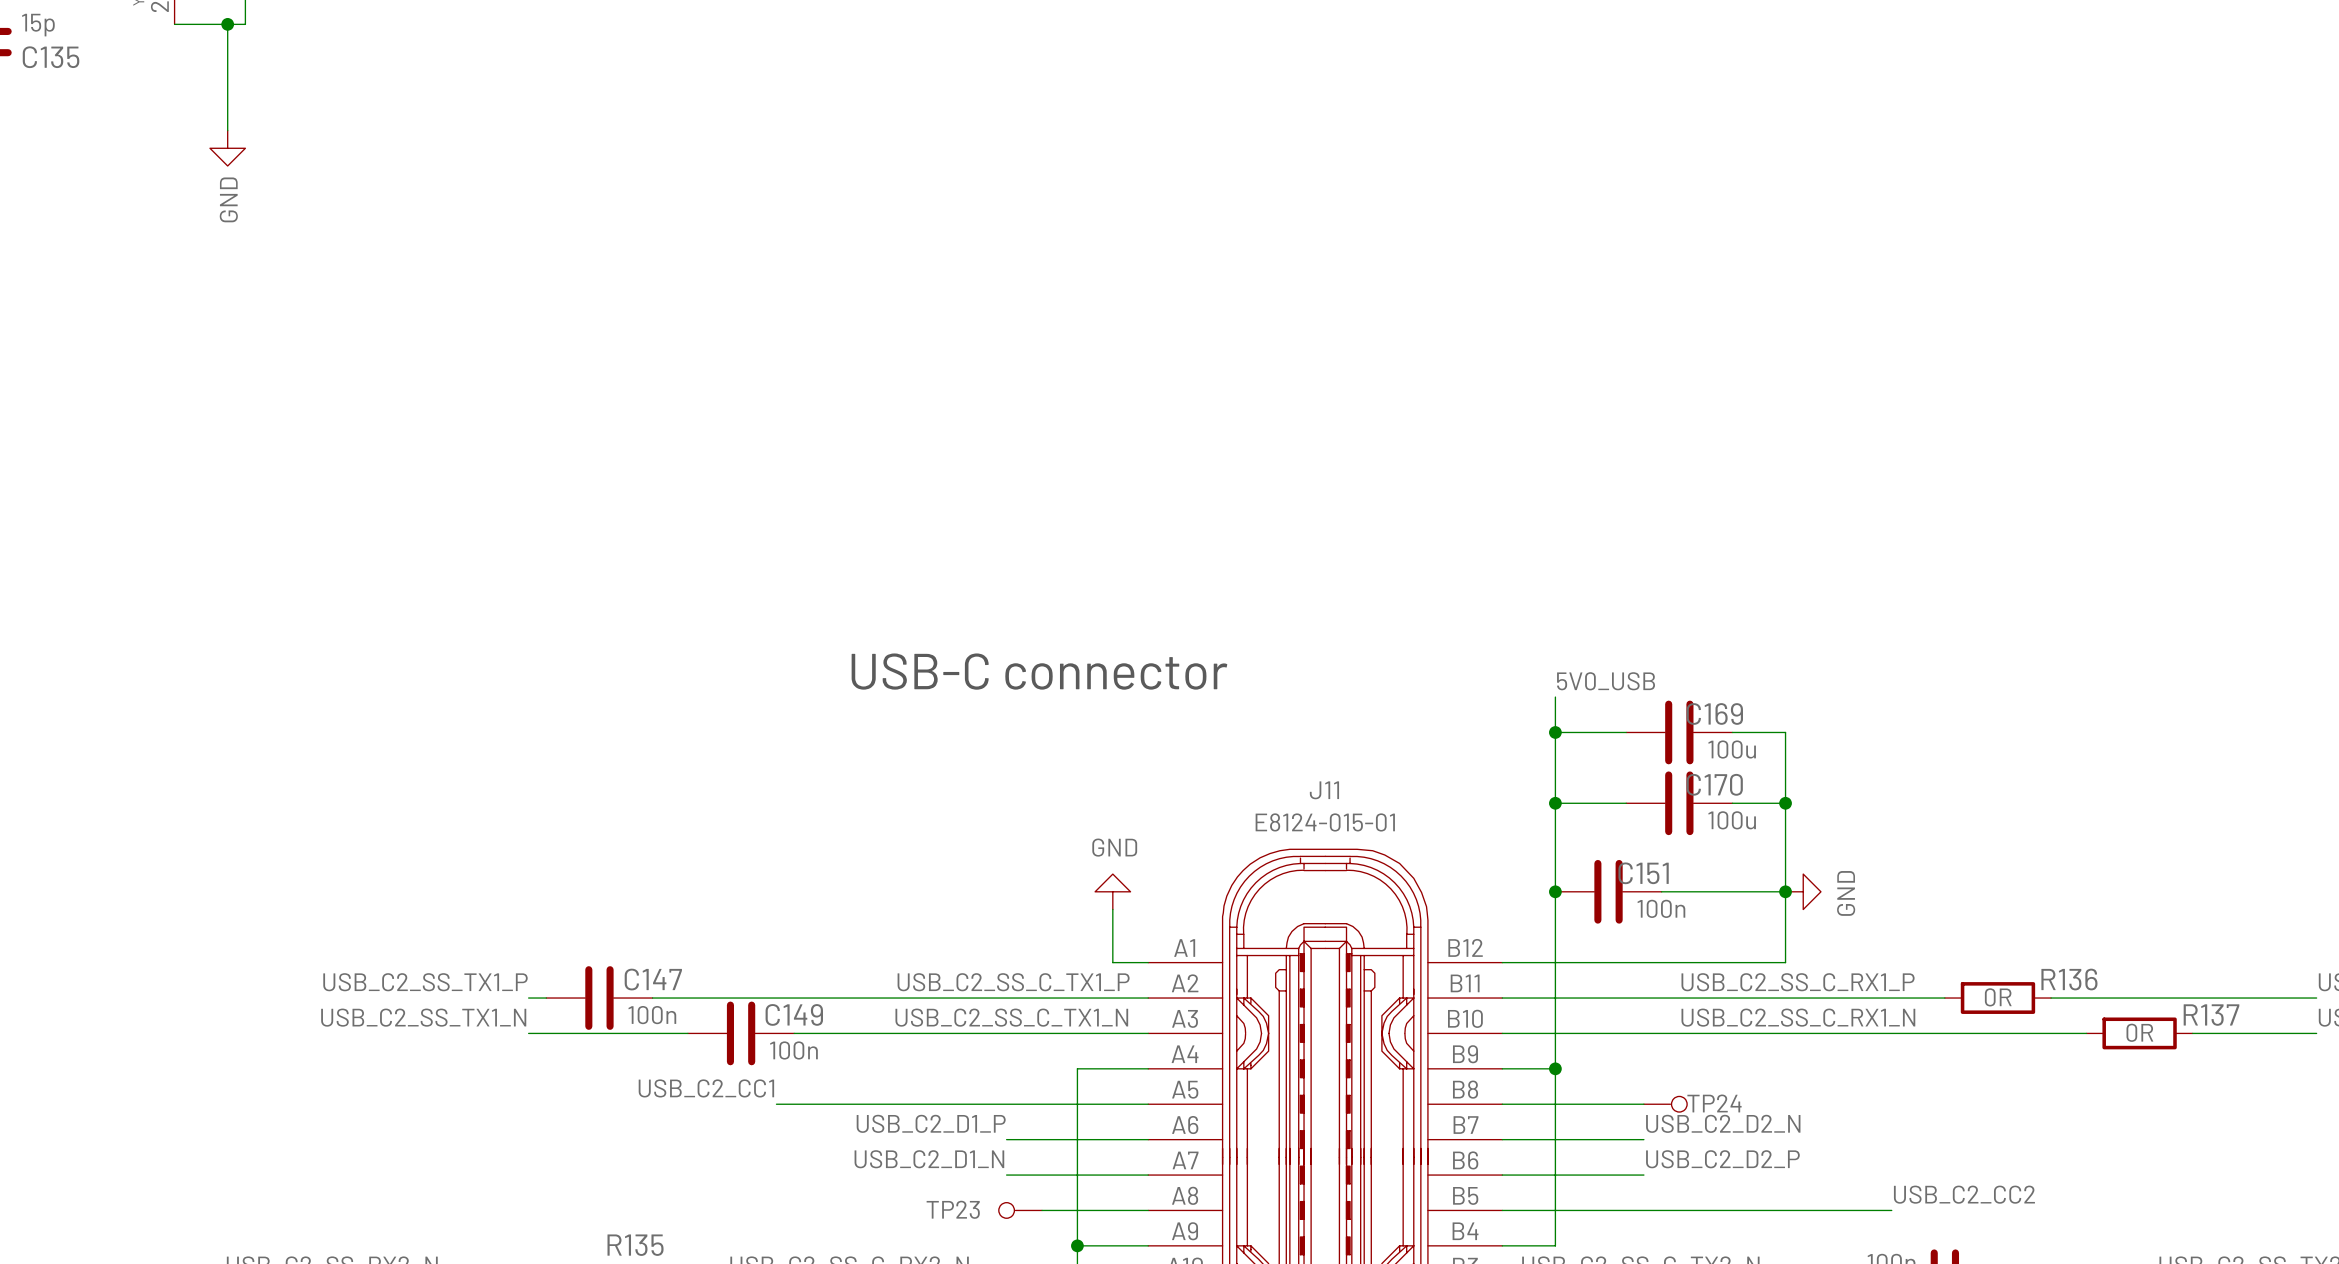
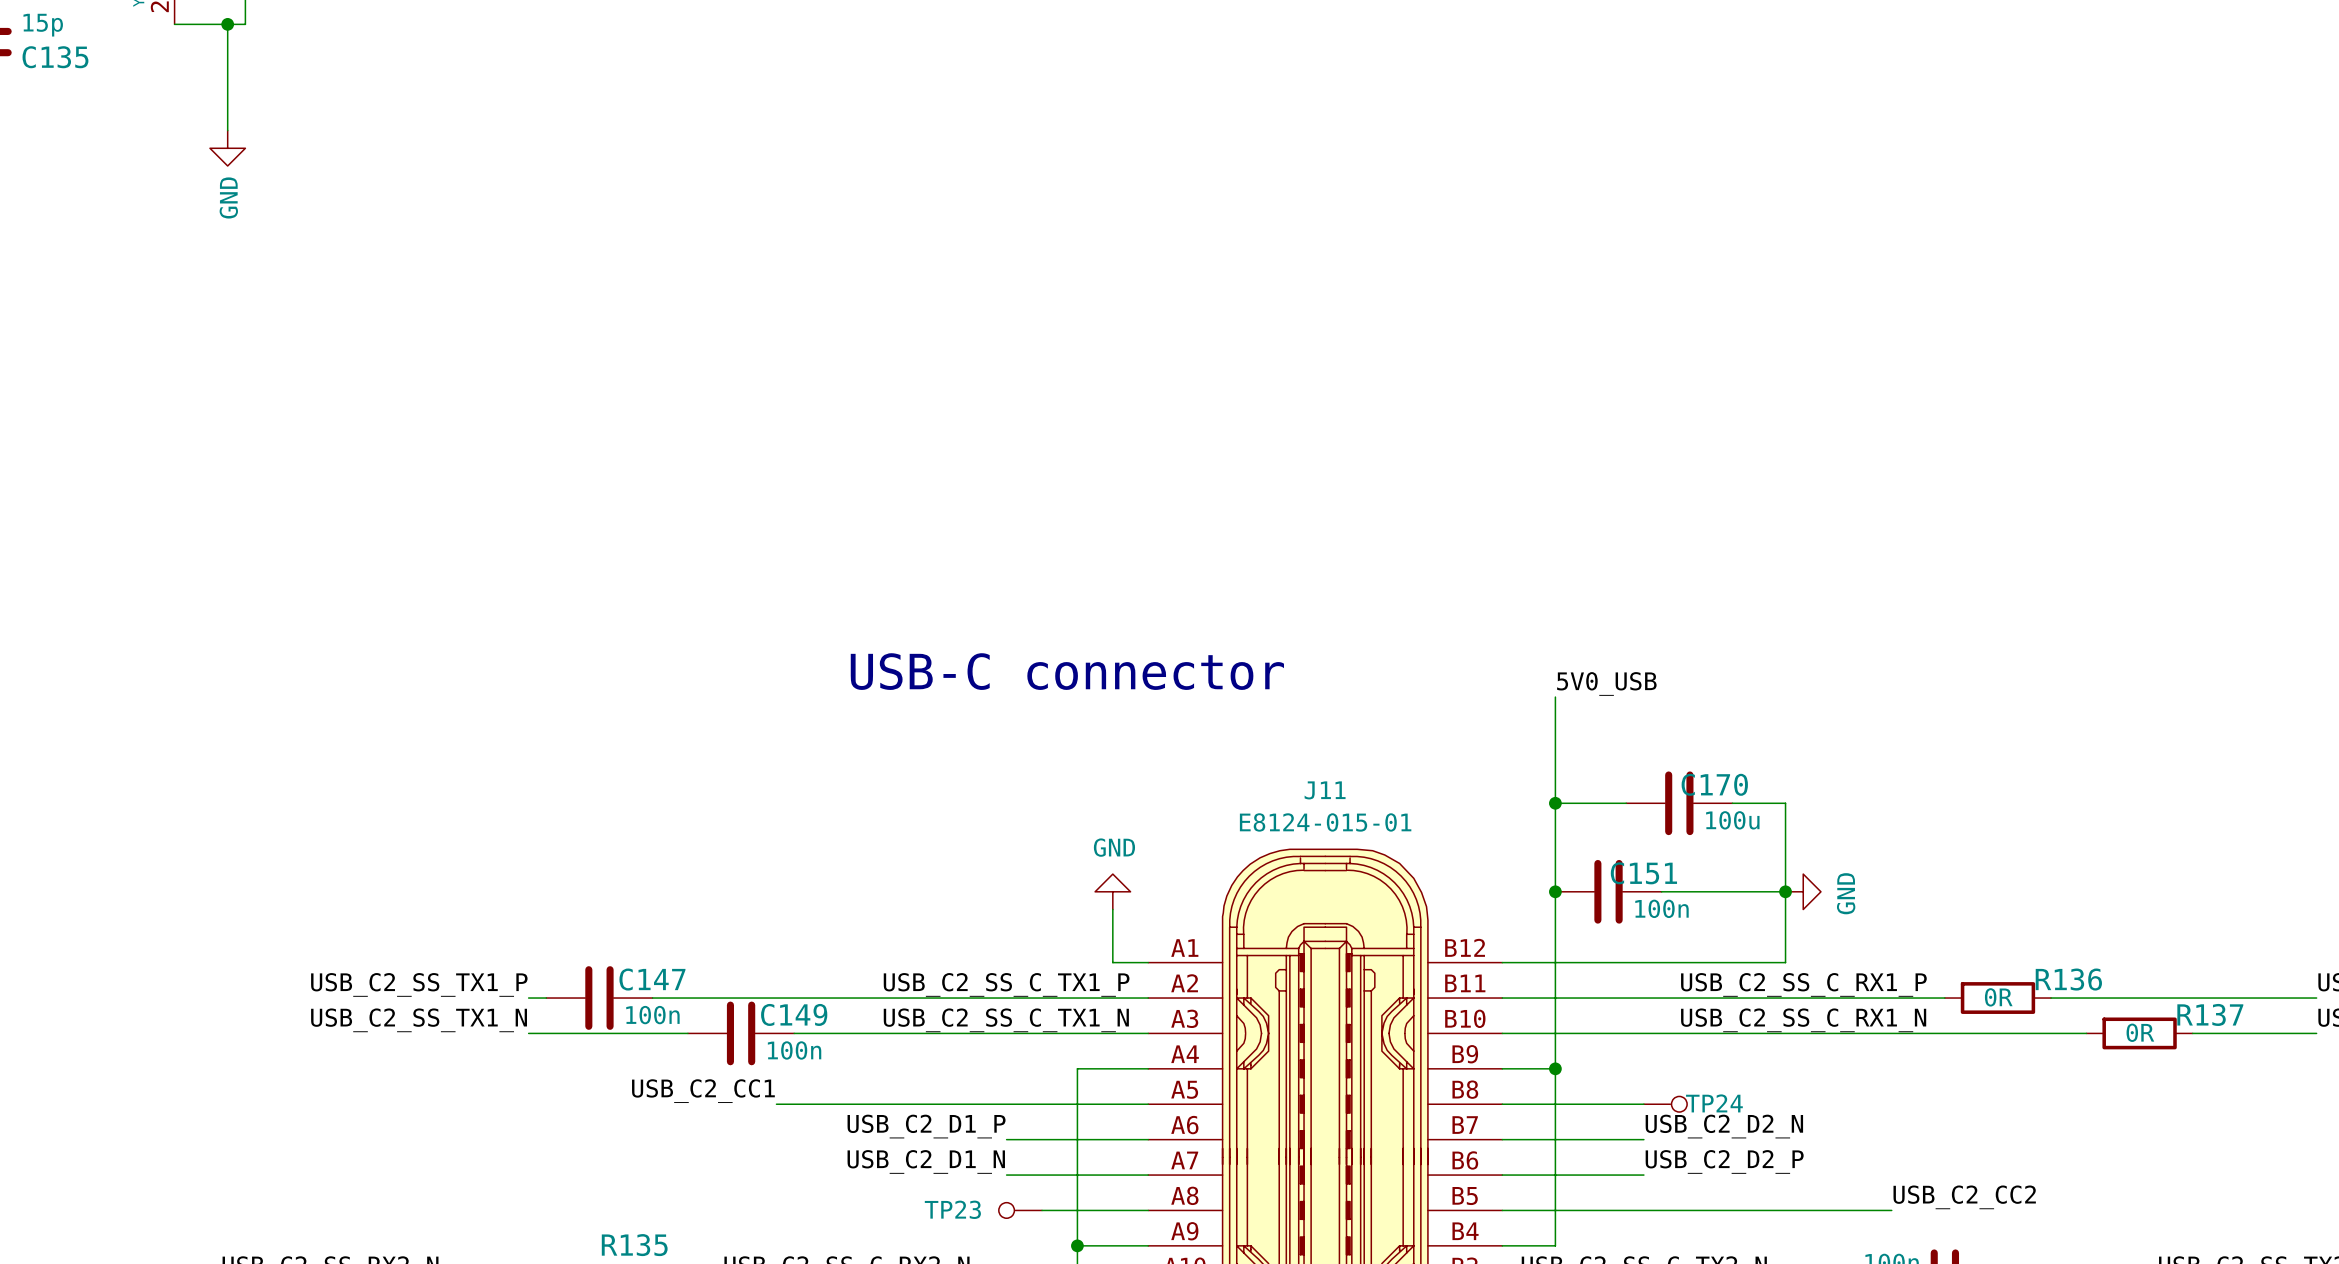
wire: (1555, 732) (1626, 732) -> none
junction: (1555, 732) -> none
C169: (1679, 732) -> none
wire: (1732, 732) (1785, 732) (1785, 803) -> none
junction: (1785, 803) -> none

